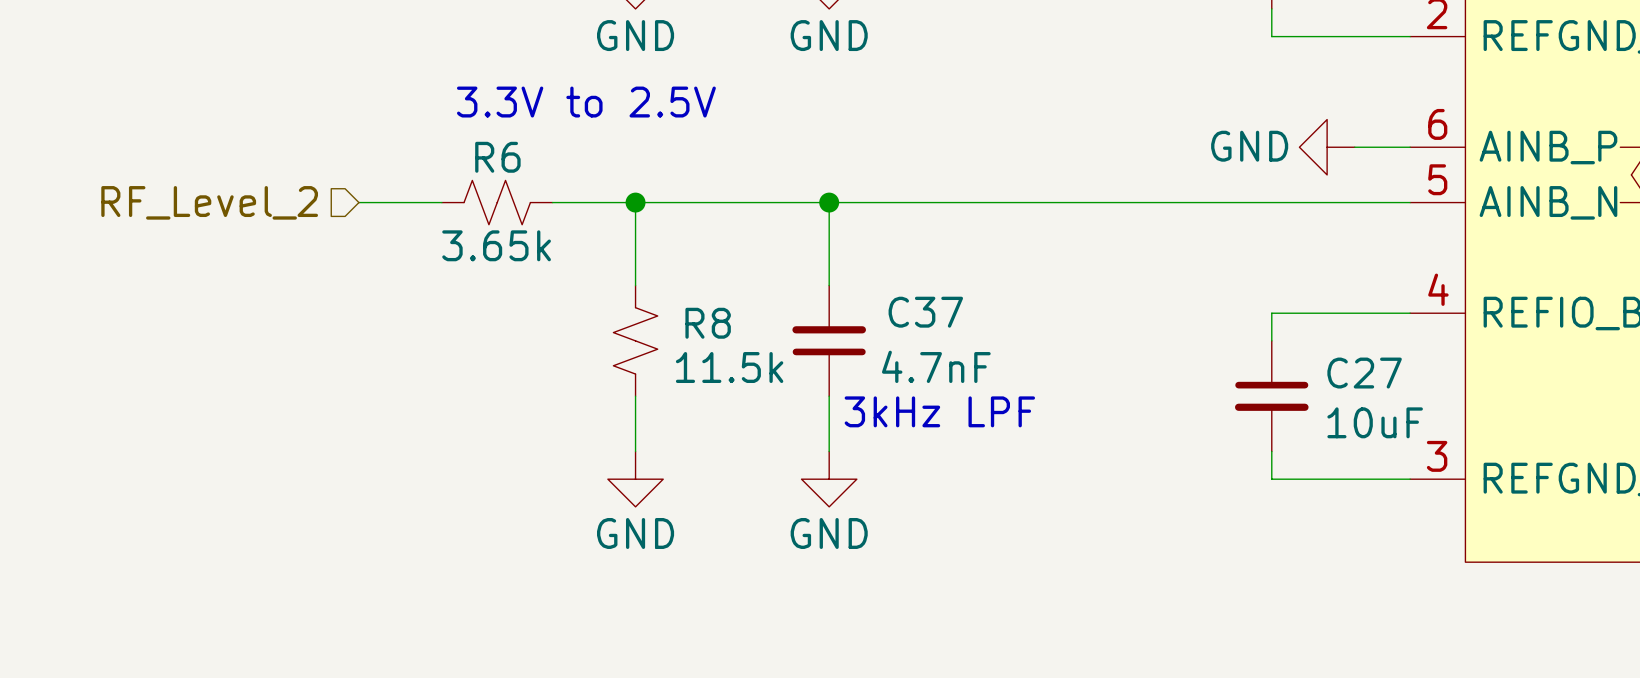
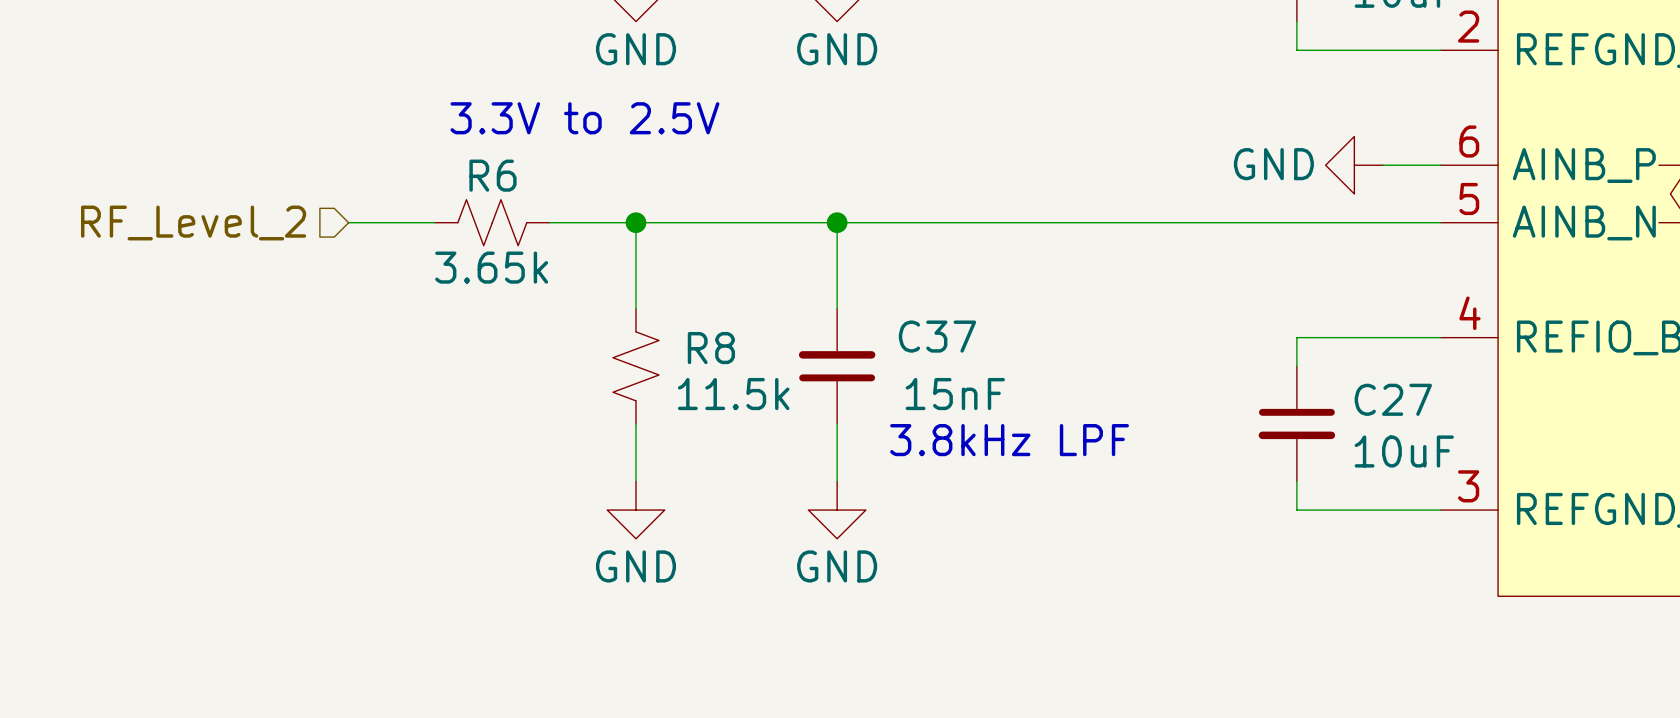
C37 value: 4.7nF (936, 366) -> 15nF (955, 394)
text: 3kHz LPF (939, 411) -> 3.8kHz LPF (1009, 440)

